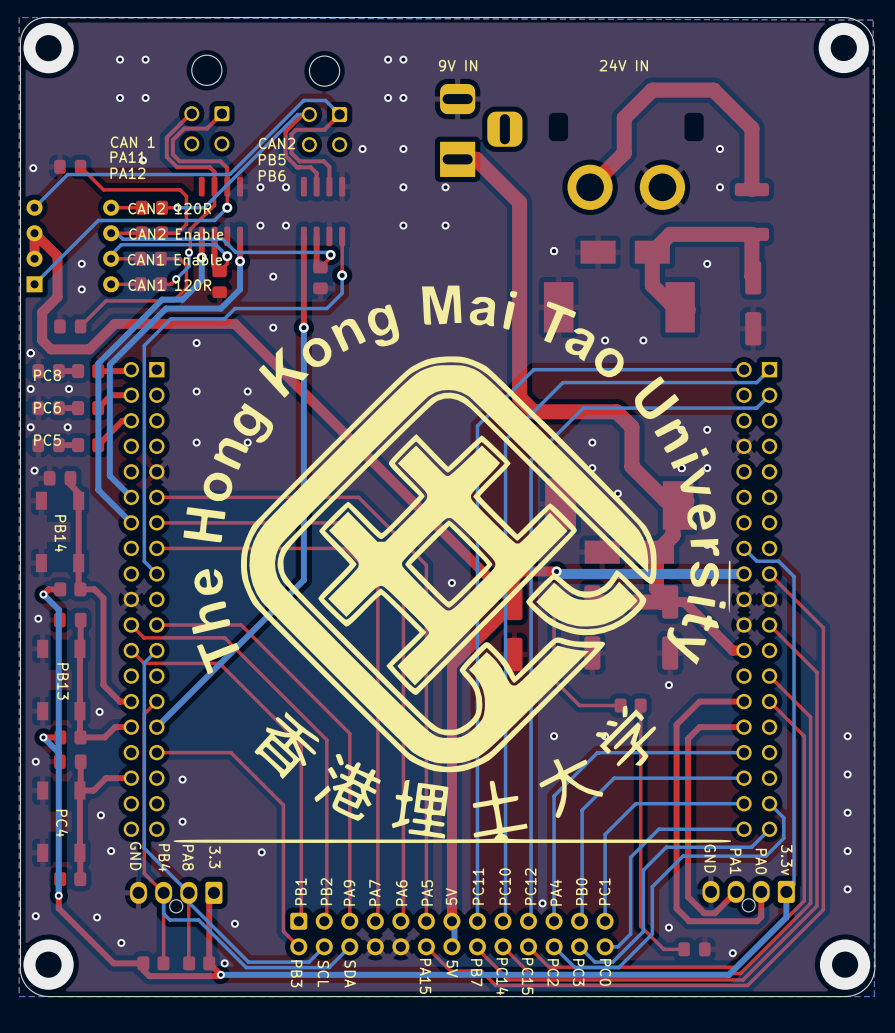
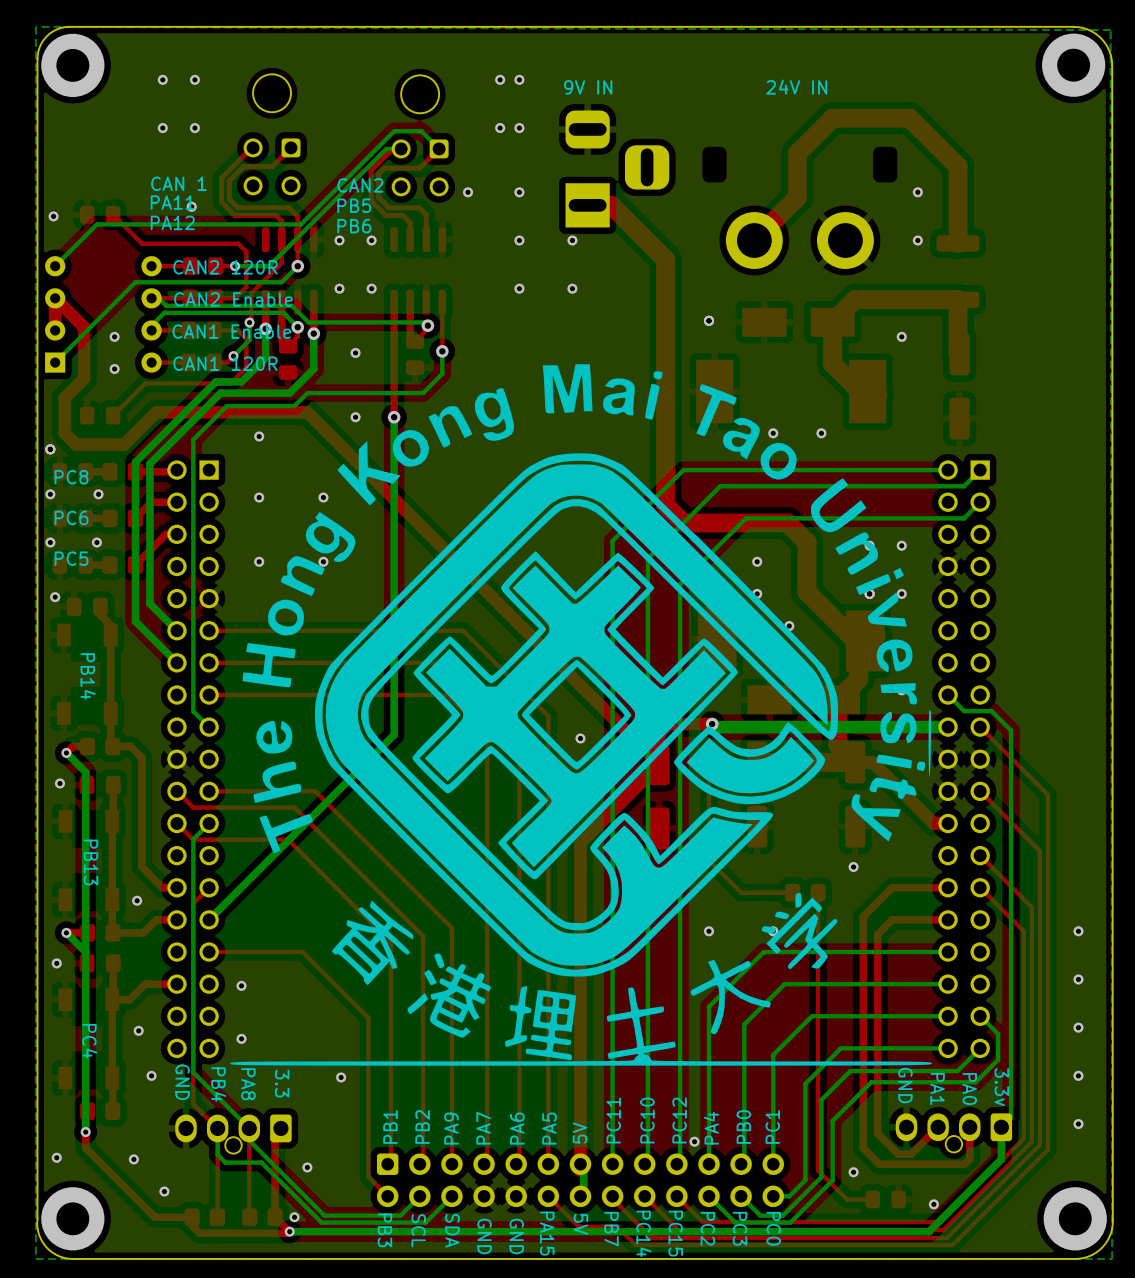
text: none -> GND (484, 1236)
text: none -> GND (516, 1236)

